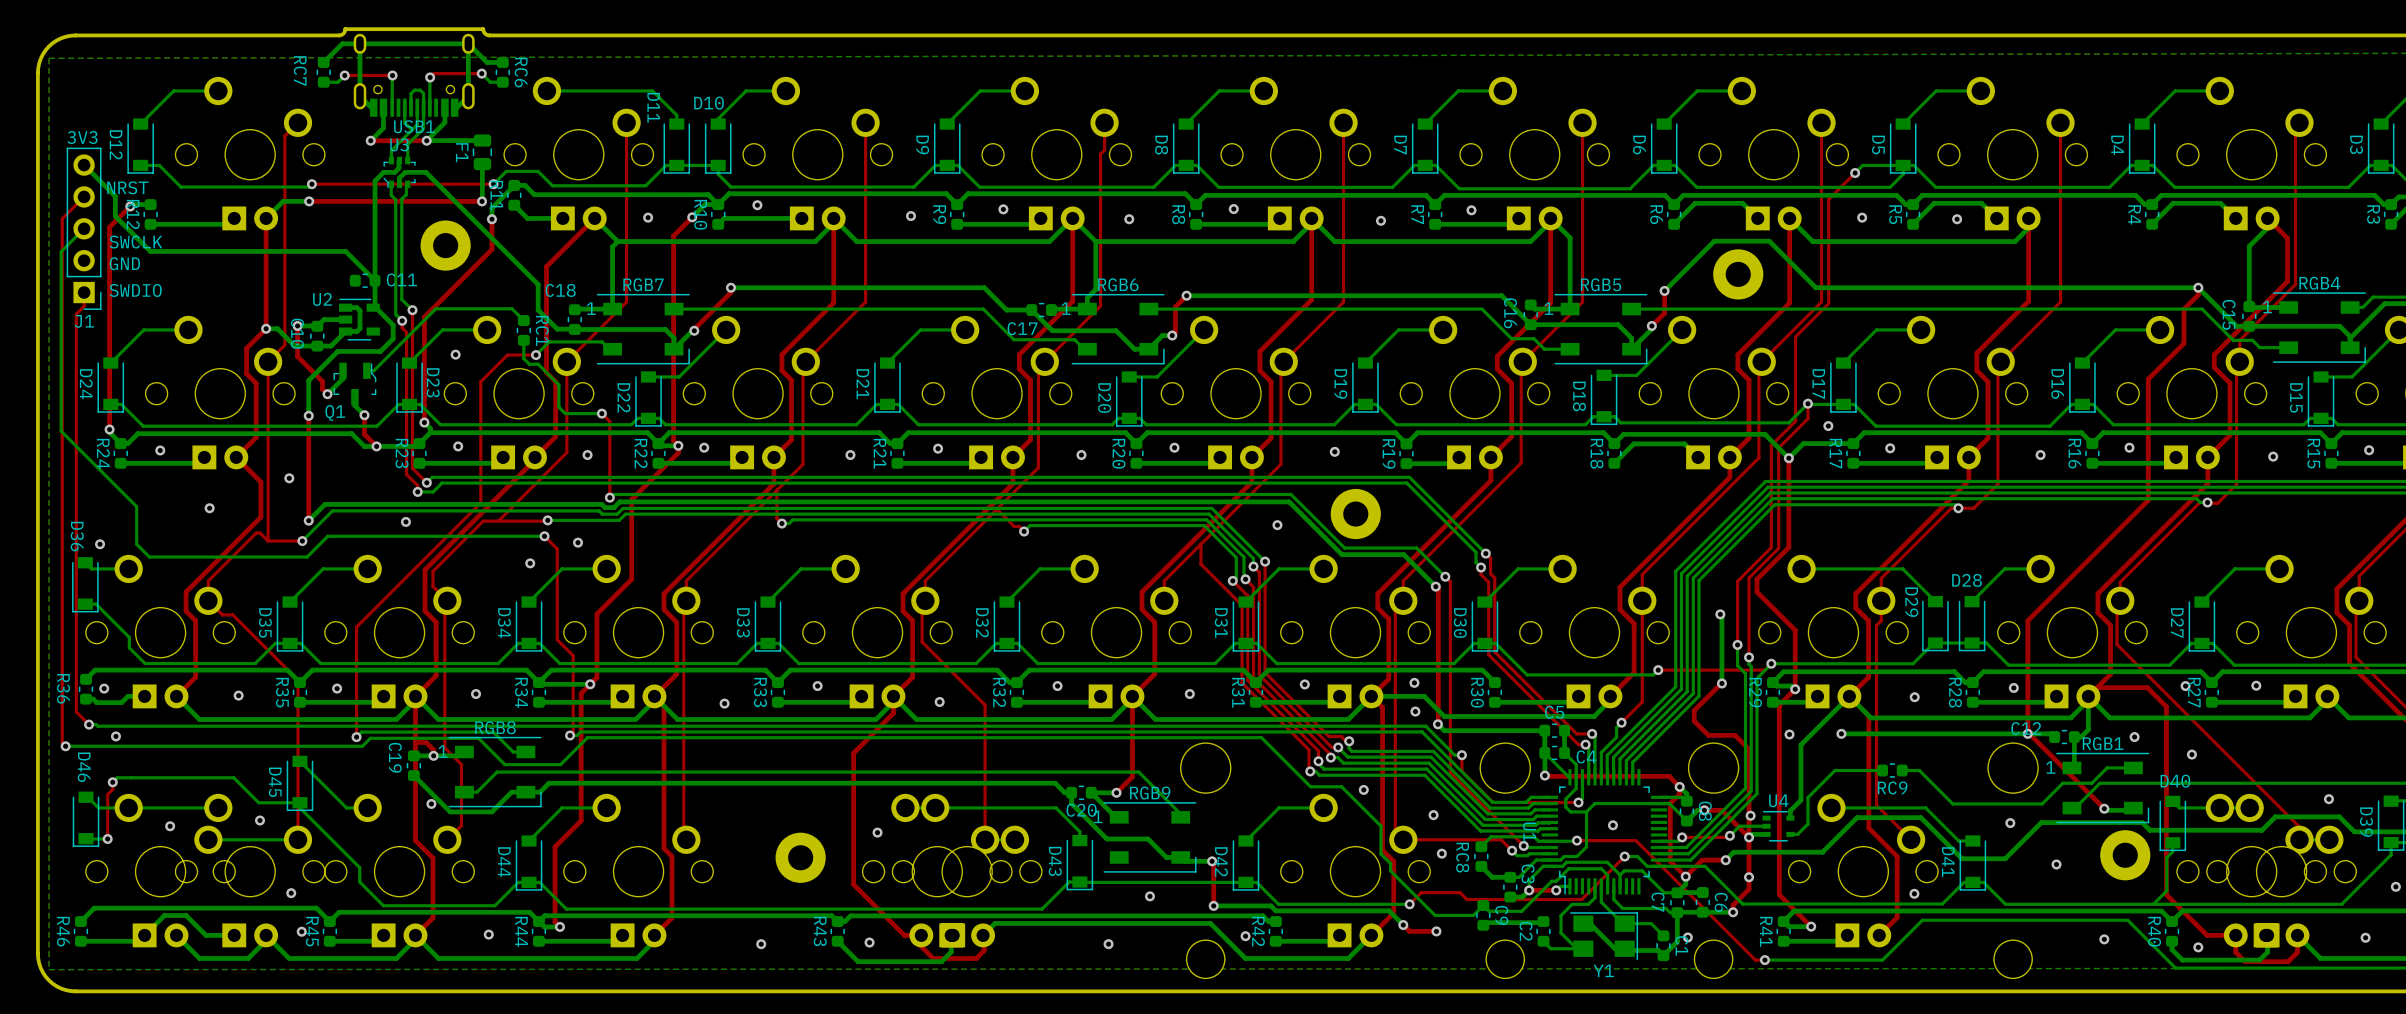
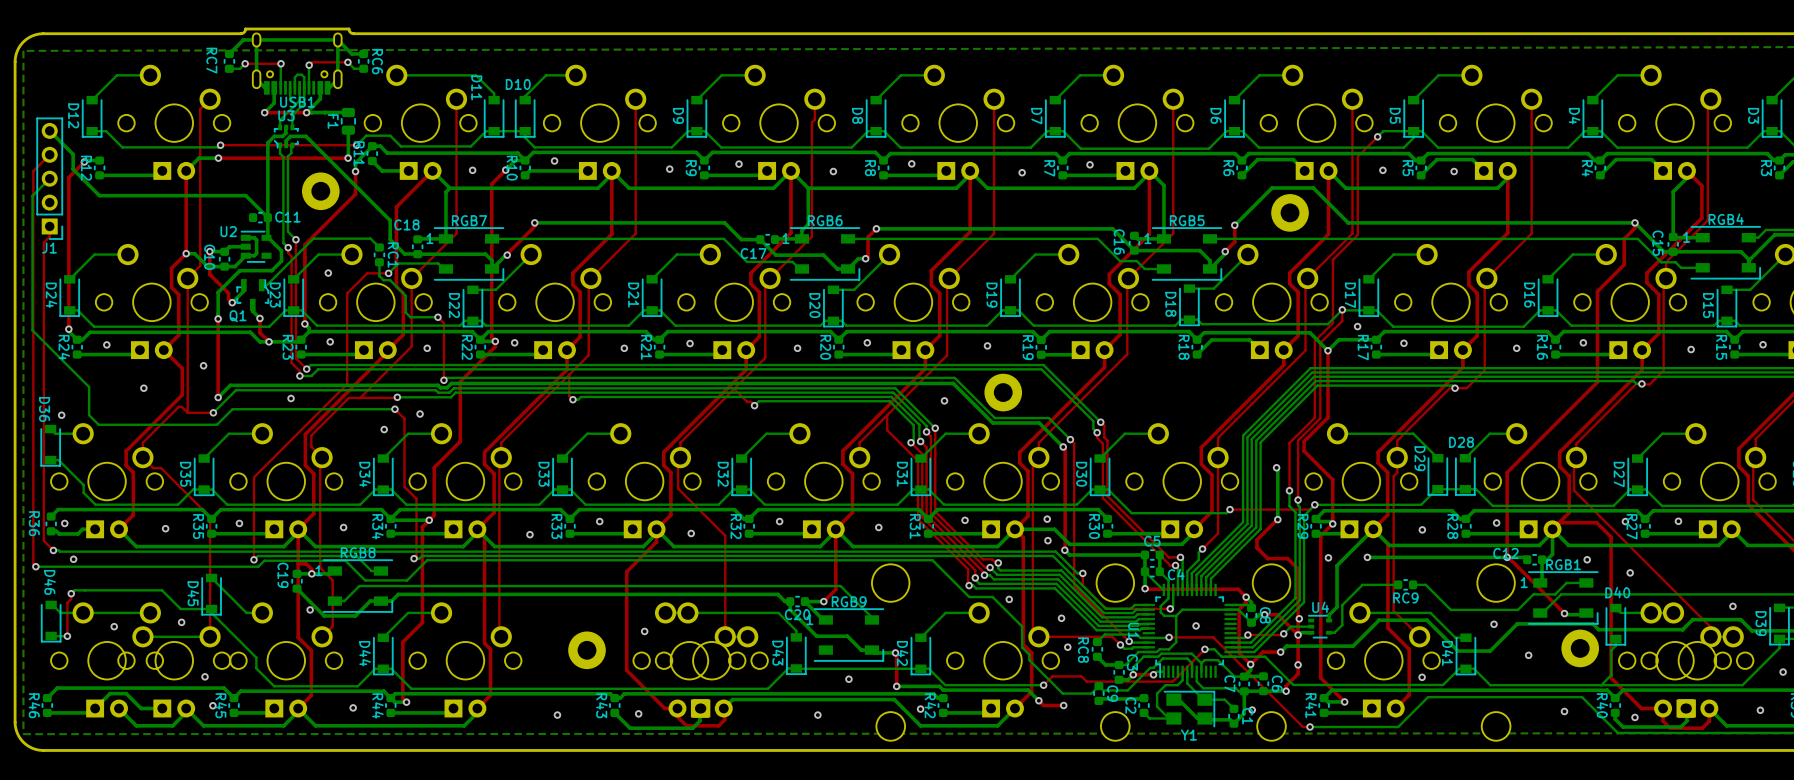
text: 3V3 (82, 137) -> none
text: NRST (127, 187) -> none
text: SWCLK (135, 242) -> none
text: GND (124, 263) -> none
text: SWDIO (135, 290) -> none
D23 name position: D23 (433, 382) -> D23 (275, 295)

